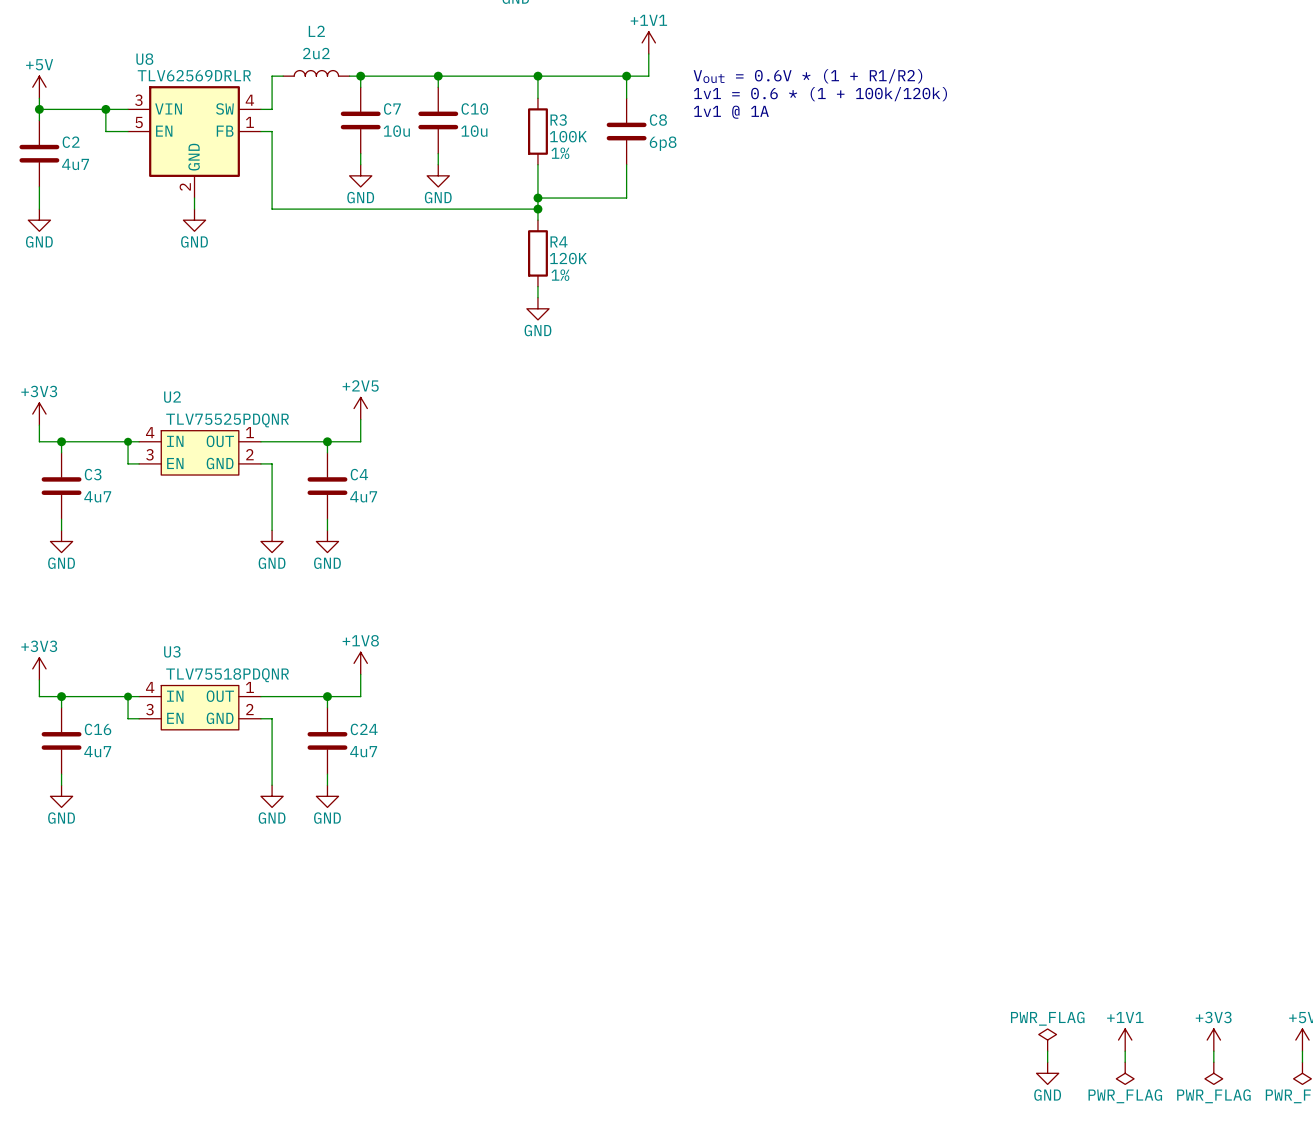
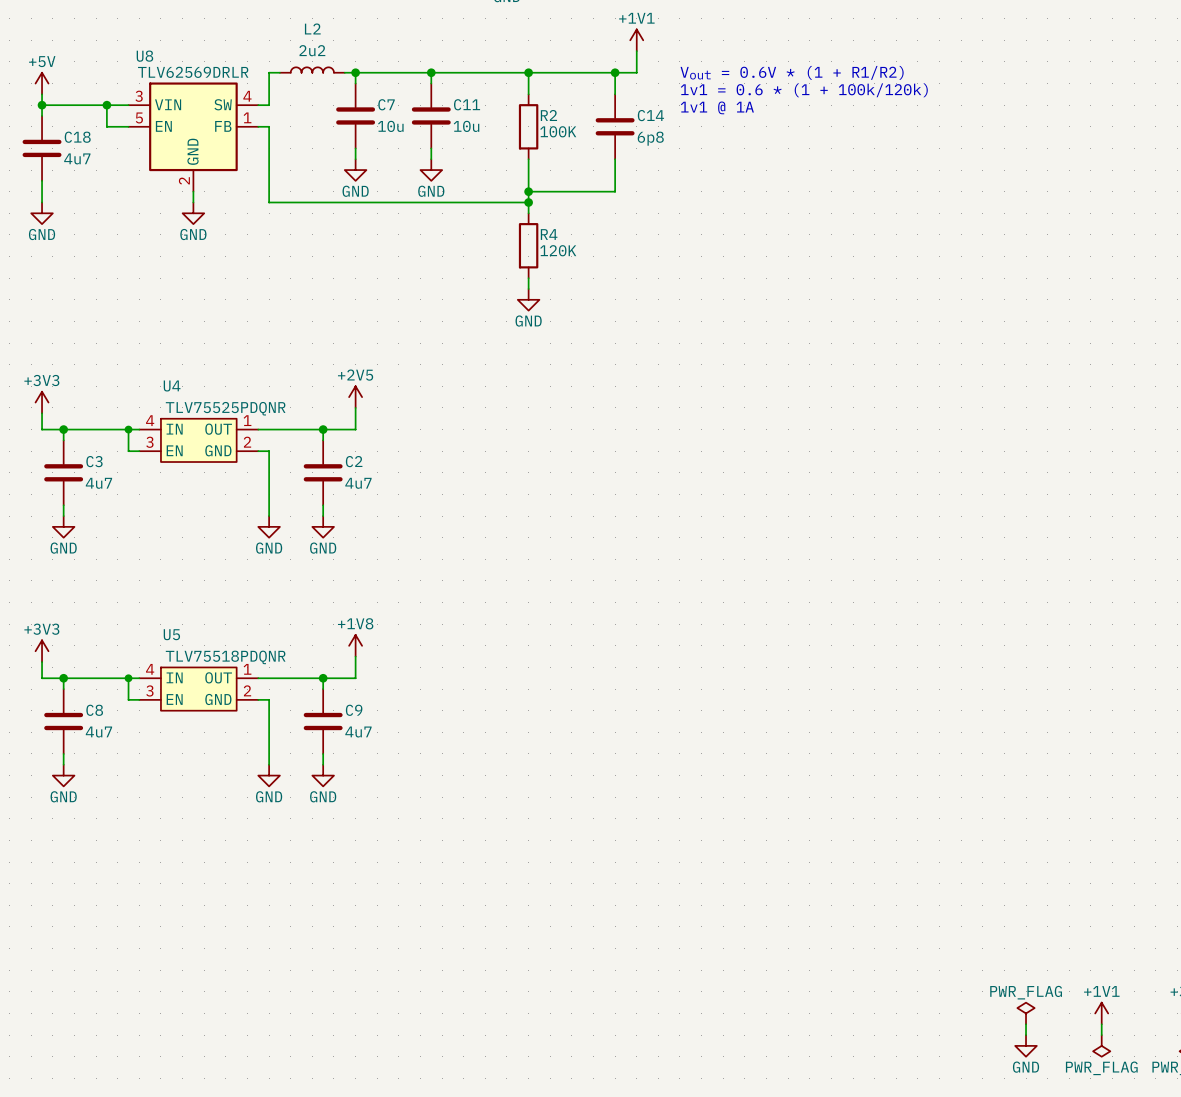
C10 name: C10 (474, 108) -> C11 (467, 104)
R3 name: R3 (558, 120) -> R2 (548, 115)
C8 name: C8 (658, 120) -> C14 (650, 115)
C2 name: C2 (71, 142) -> C18 (77, 137)
R3 text: 1% (560, 153) -> none
R4 text: 1% (560, 275) -> none
U2 name: U2 (172, 397) -> U4 (172, 386)
C4 name: C4 (359, 474) -> C2 (354, 461)
U3 name: U3 (172, 651) -> U5 (171, 634)
C16 name: C16 (98, 729) -> C8 (94, 710)
C24 name: C24 (364, 729) -> C9 (354, 710)

